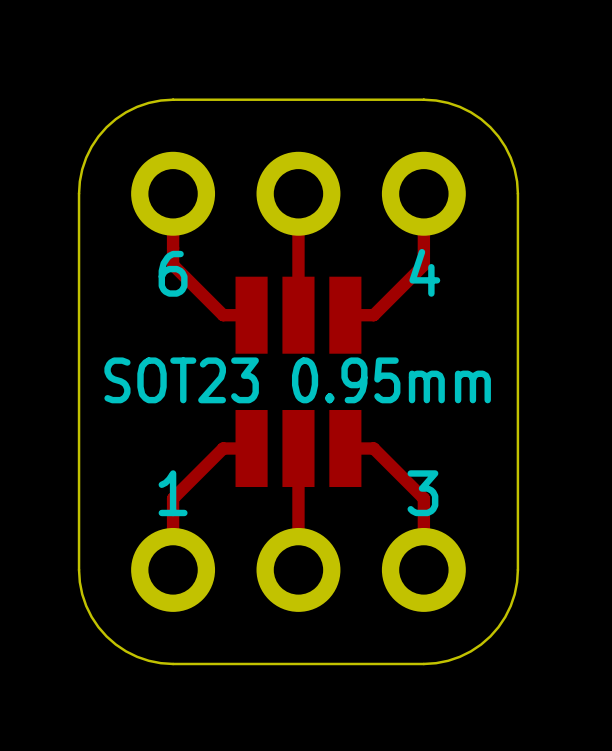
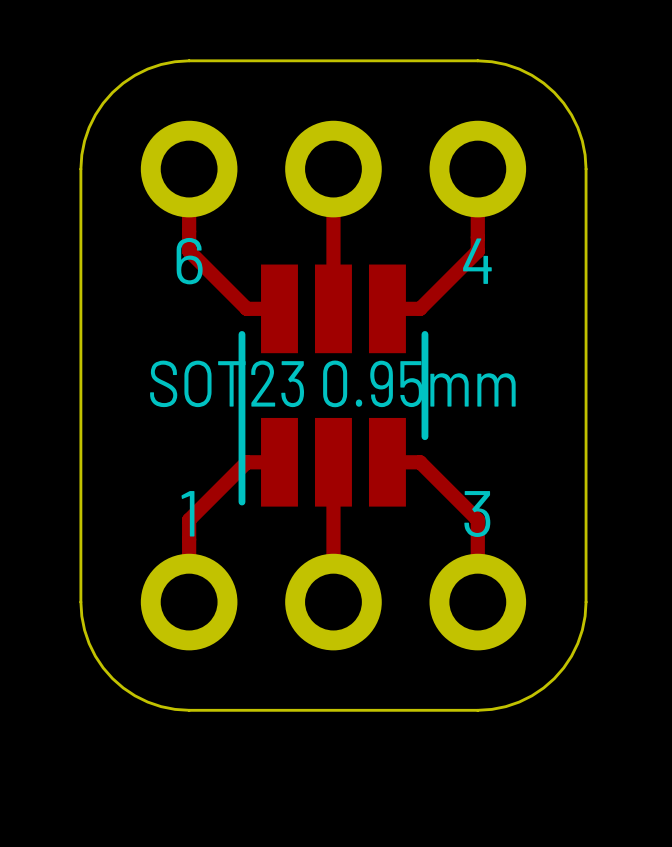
part footprint: [235, 276, 362, 488] -> [238, 264, 429, 507]

